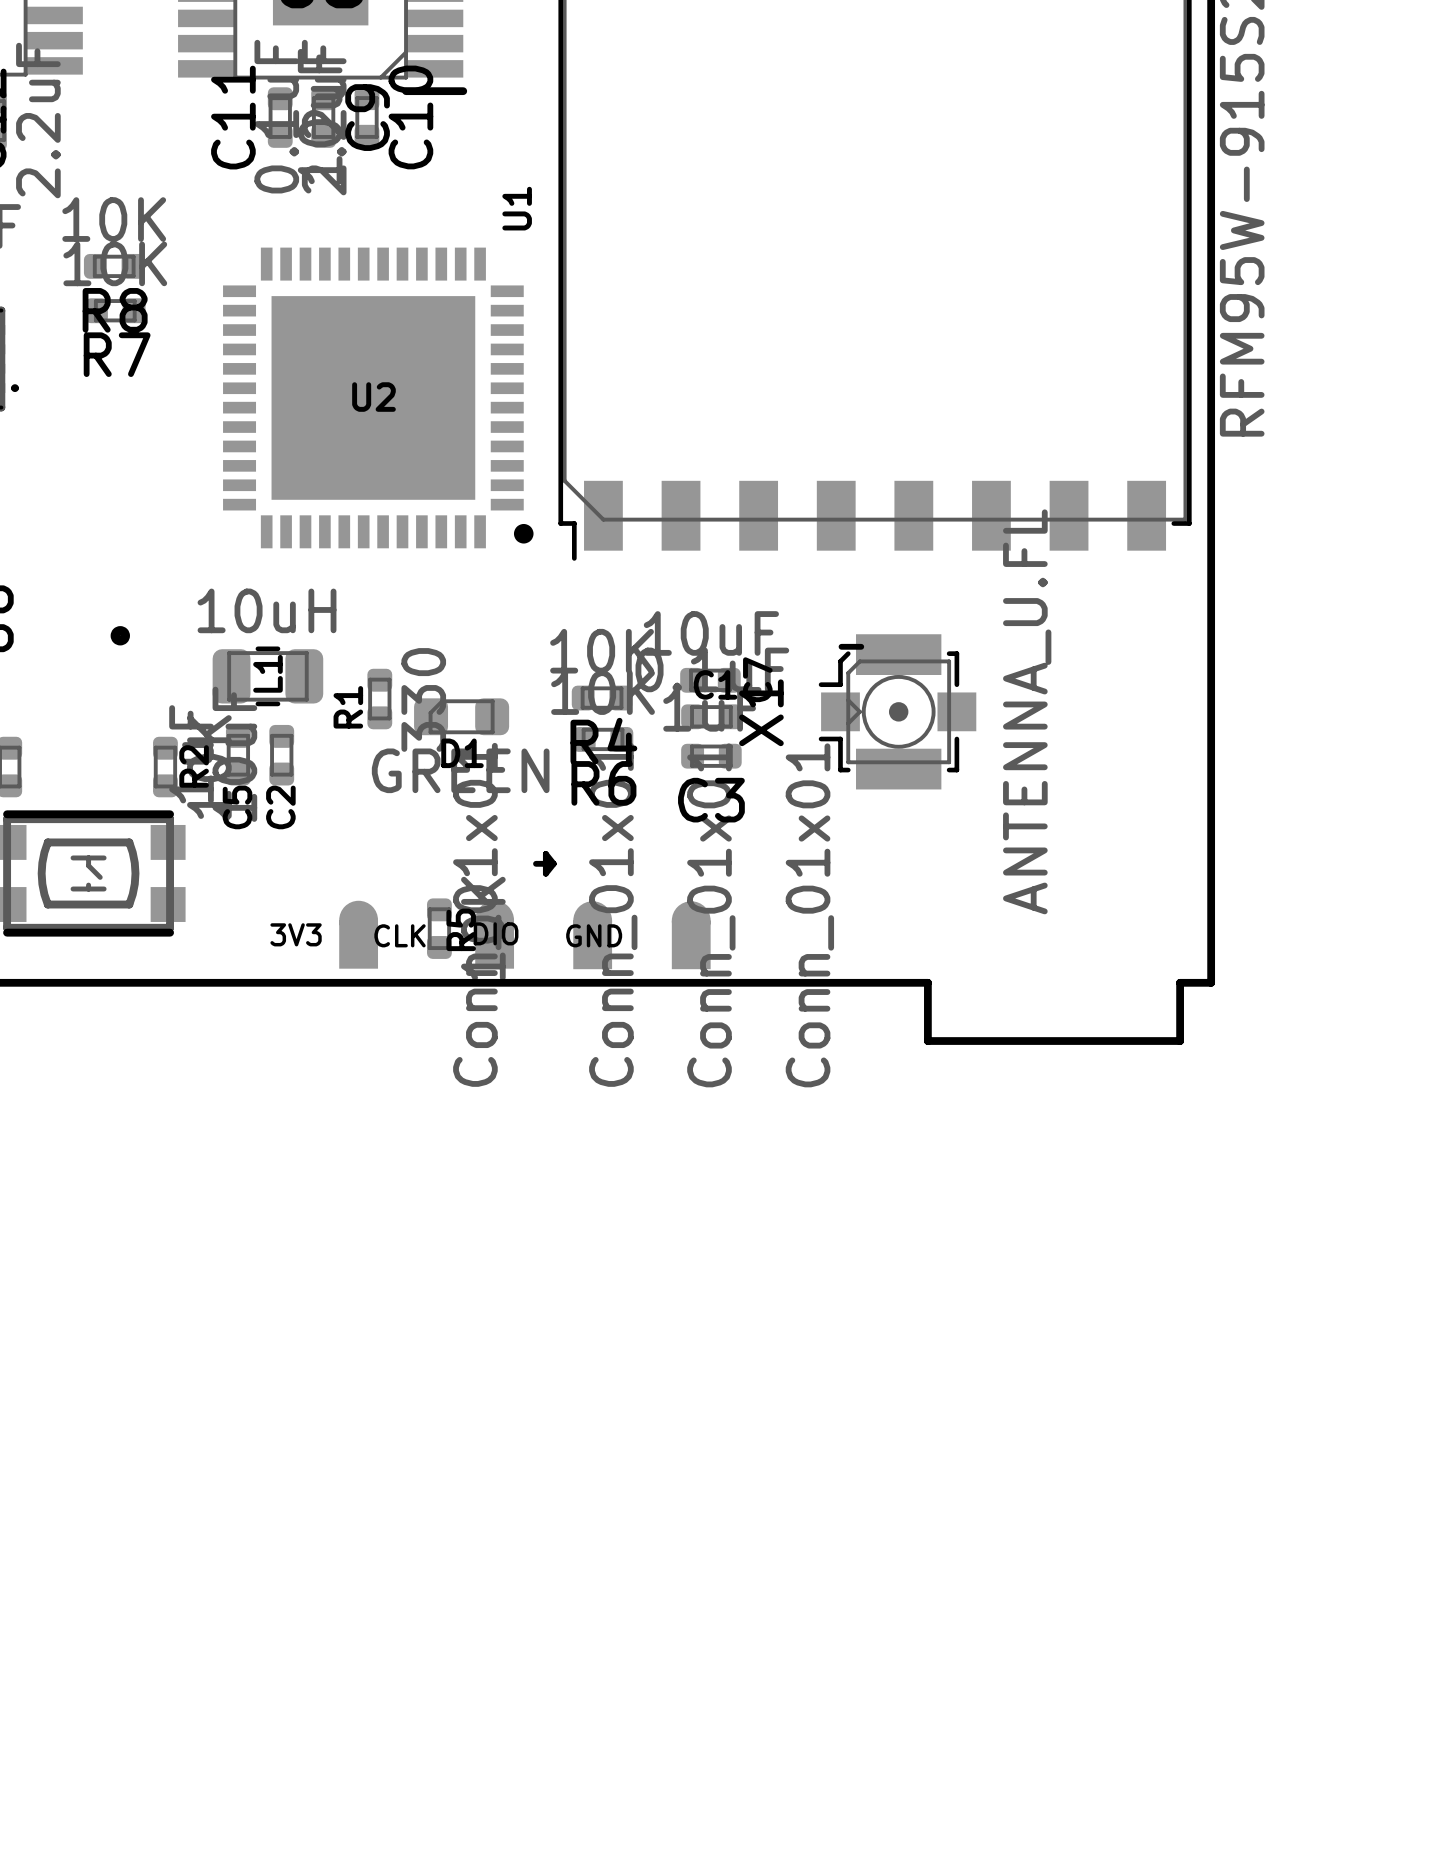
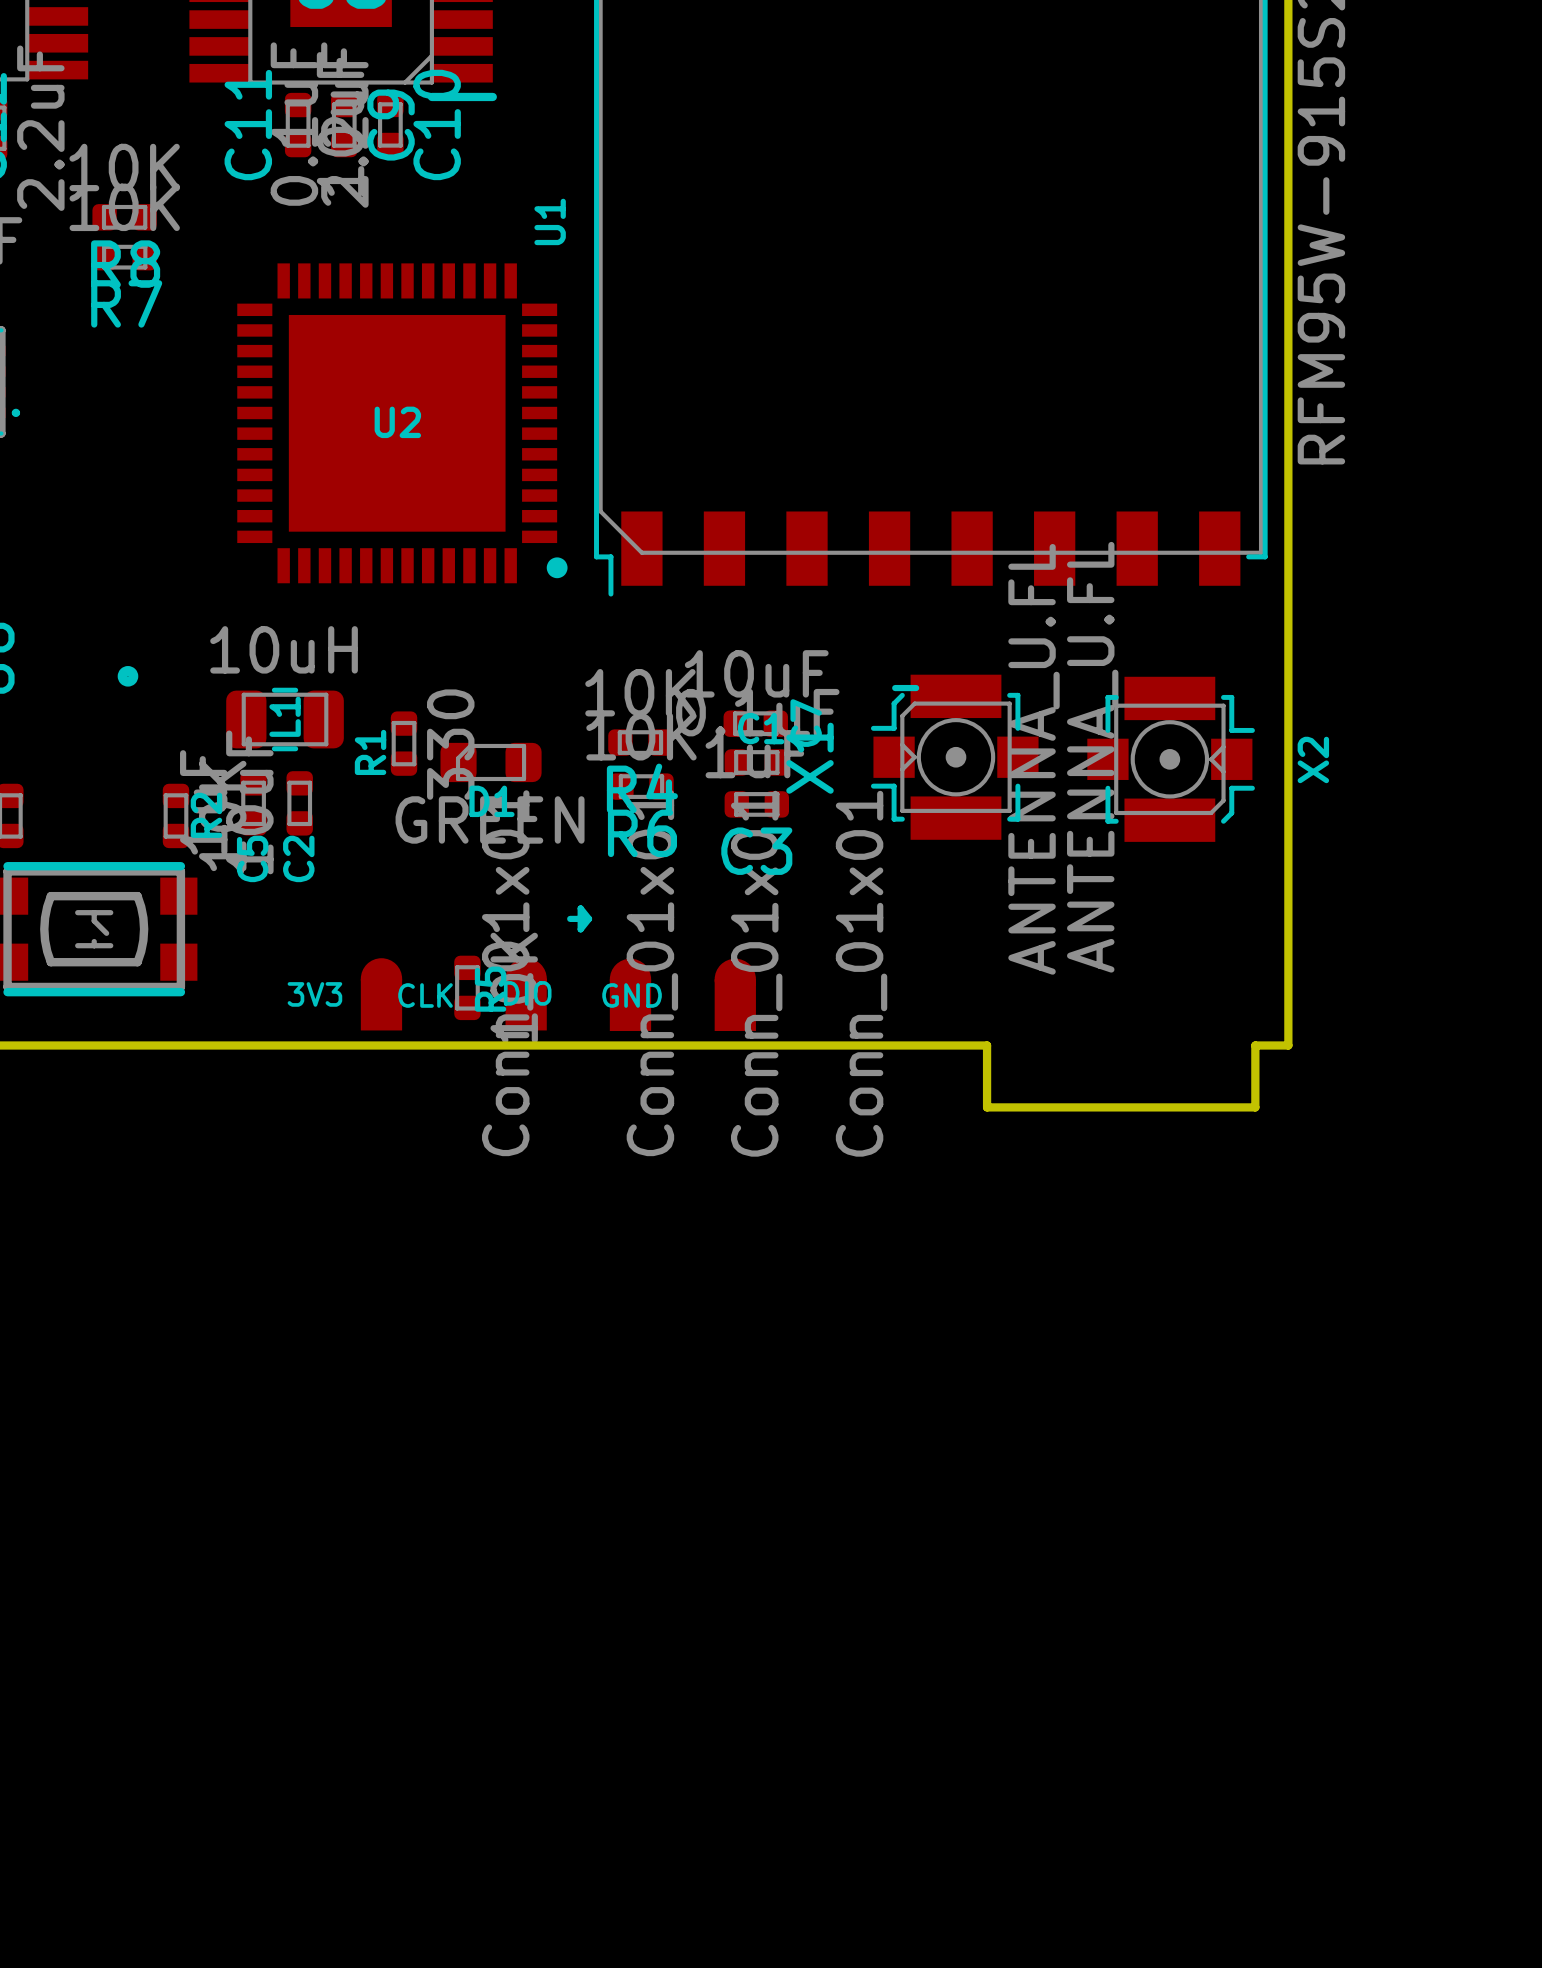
R8 position: (114, 266) -> (124, 217)
R7 position: (115, 310) -> (124, 257)
X2: none -> ANTENNA_U.FL (1171, 759)

